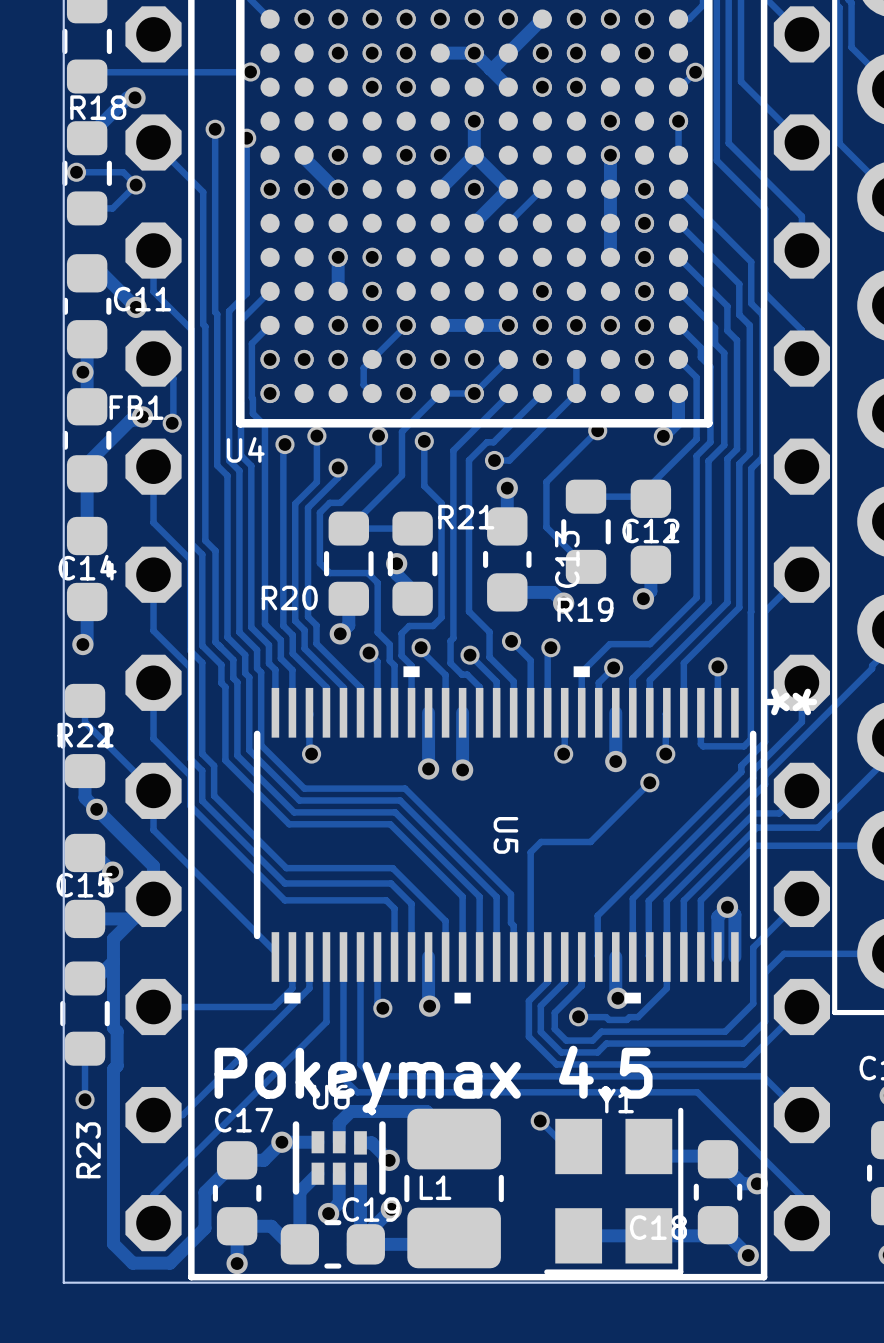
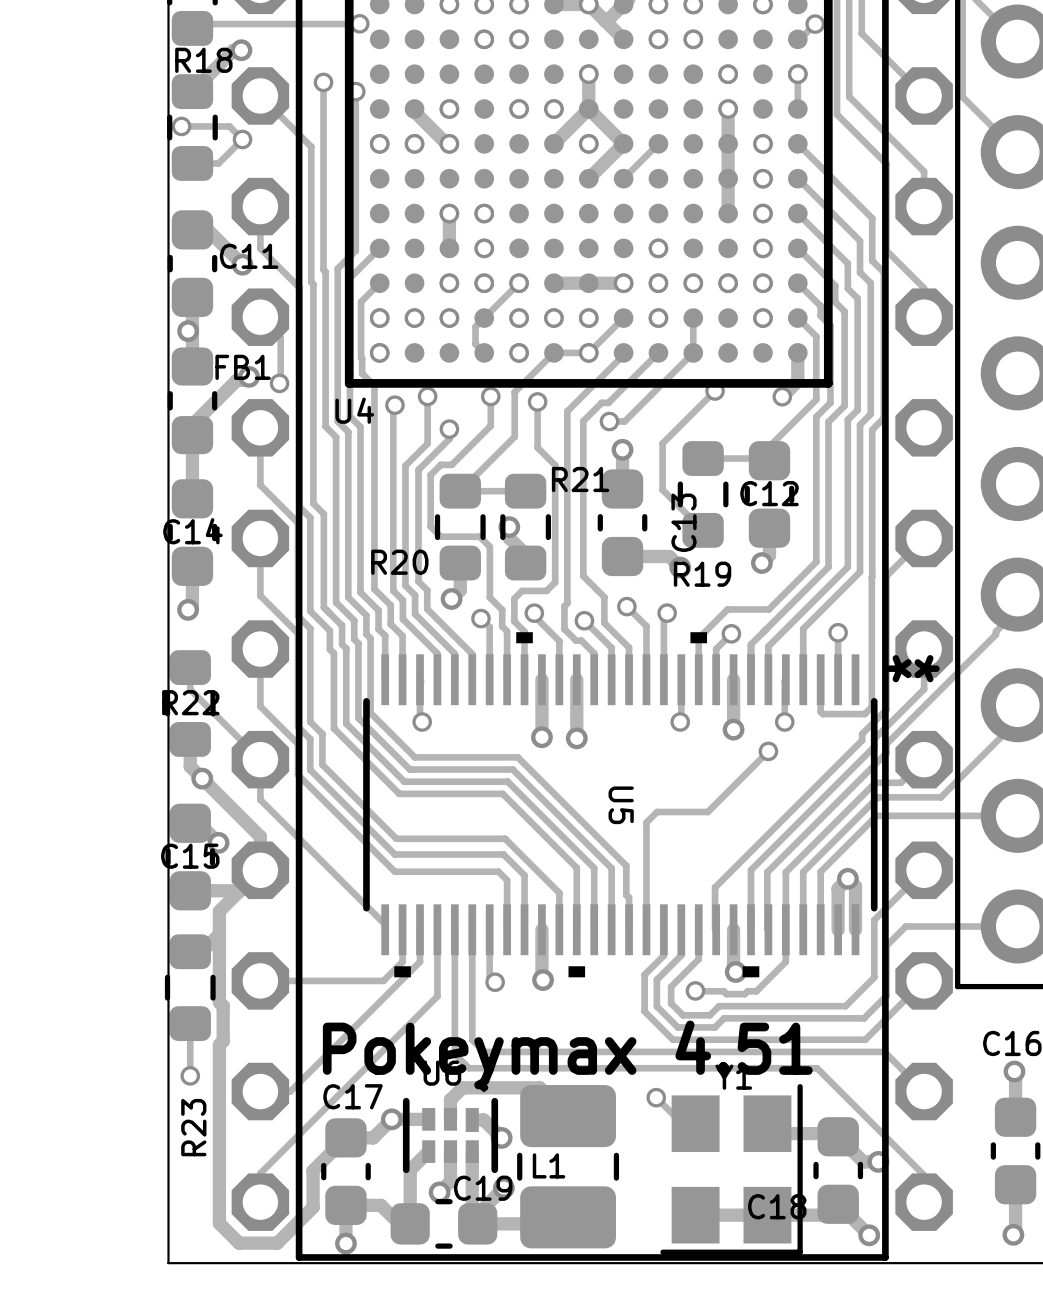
text: Pokeymax 4.5 (433, 1079) -> Pokeymax 4.51 (567, 1054)

